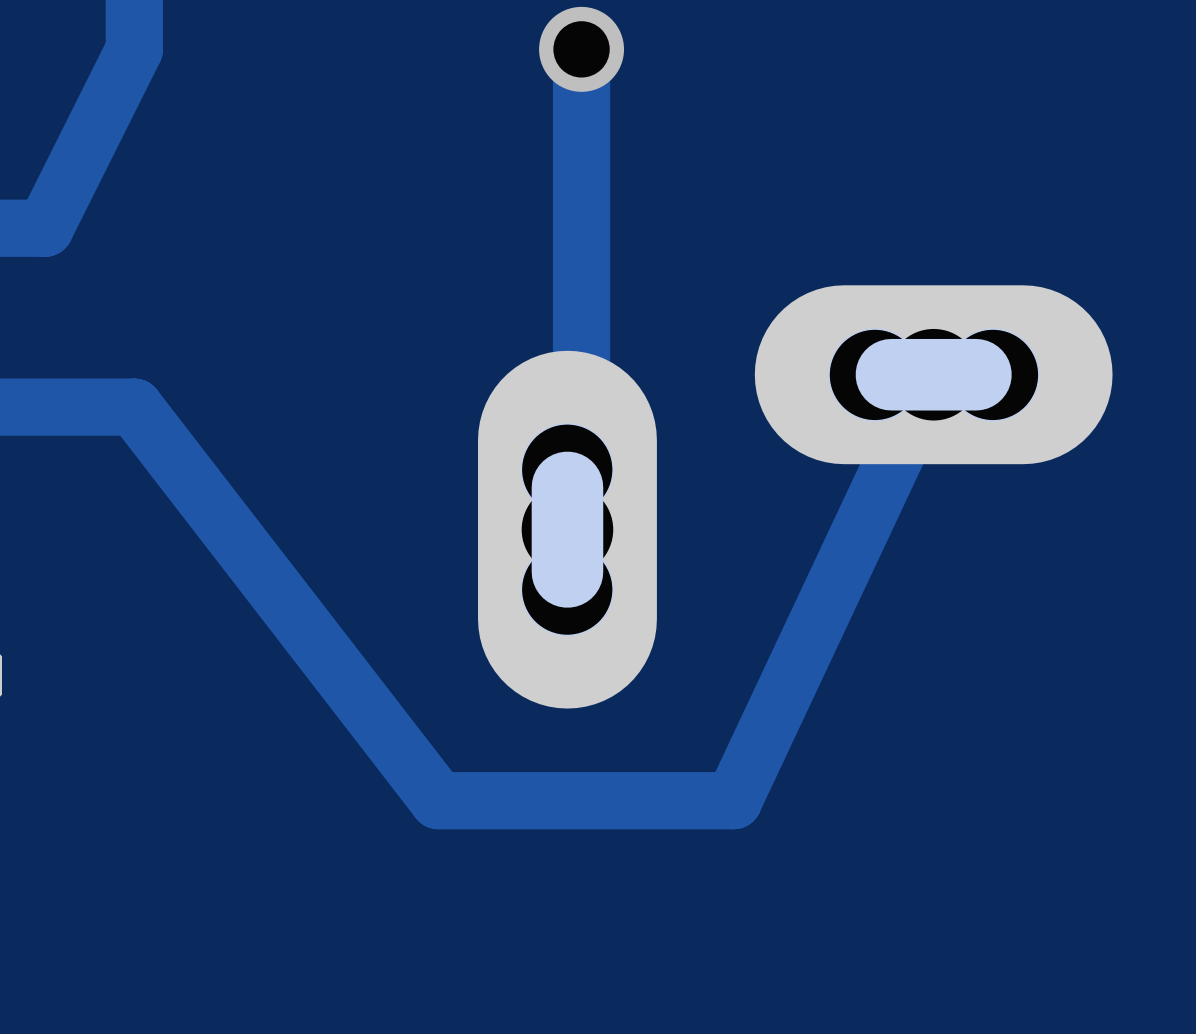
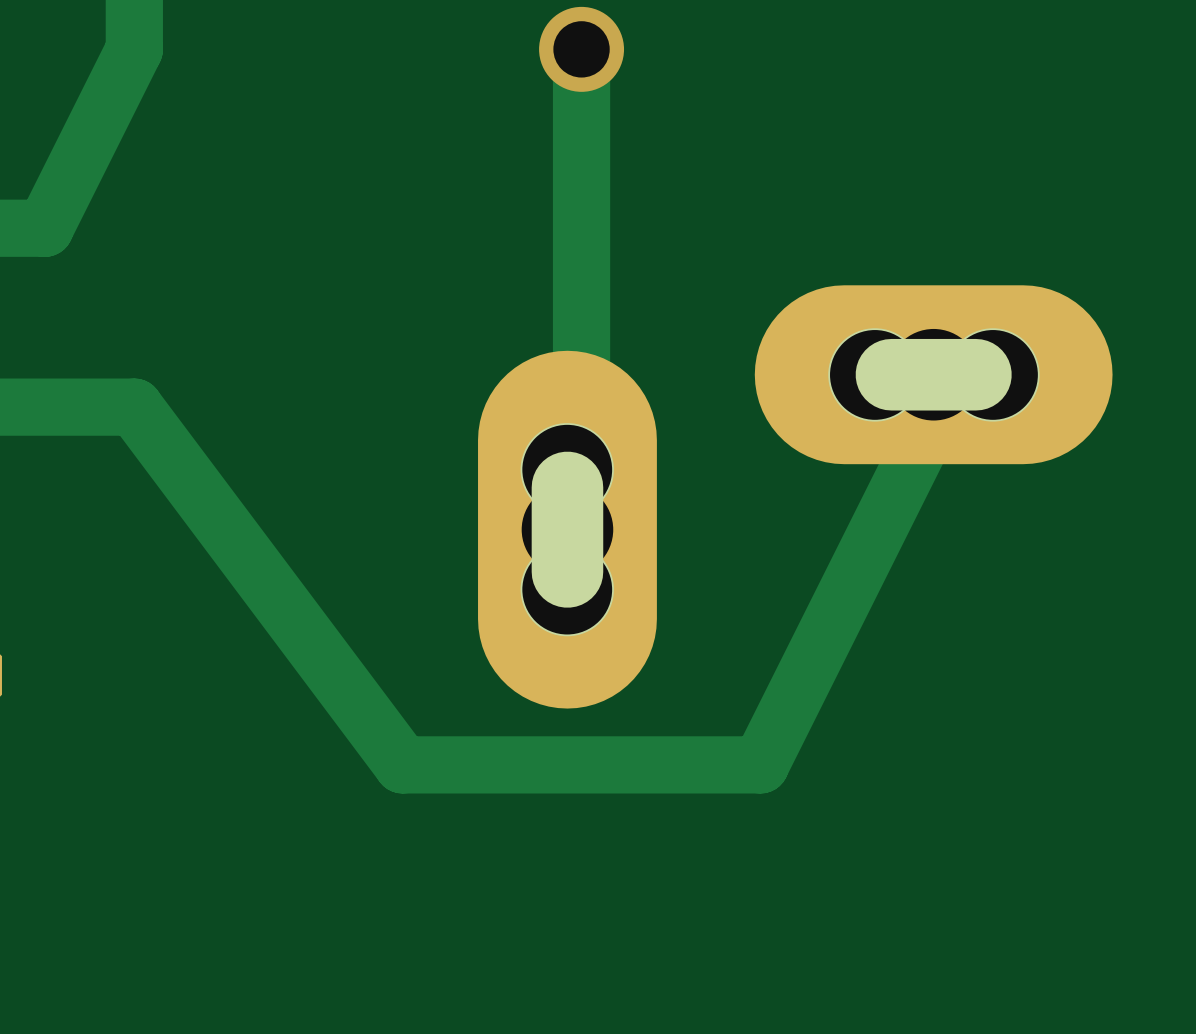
track: (933, 374) (733, 800) (438, 800) (134, 407) -> (939, 407) (760, 764) (402, 764) (134, 407)

